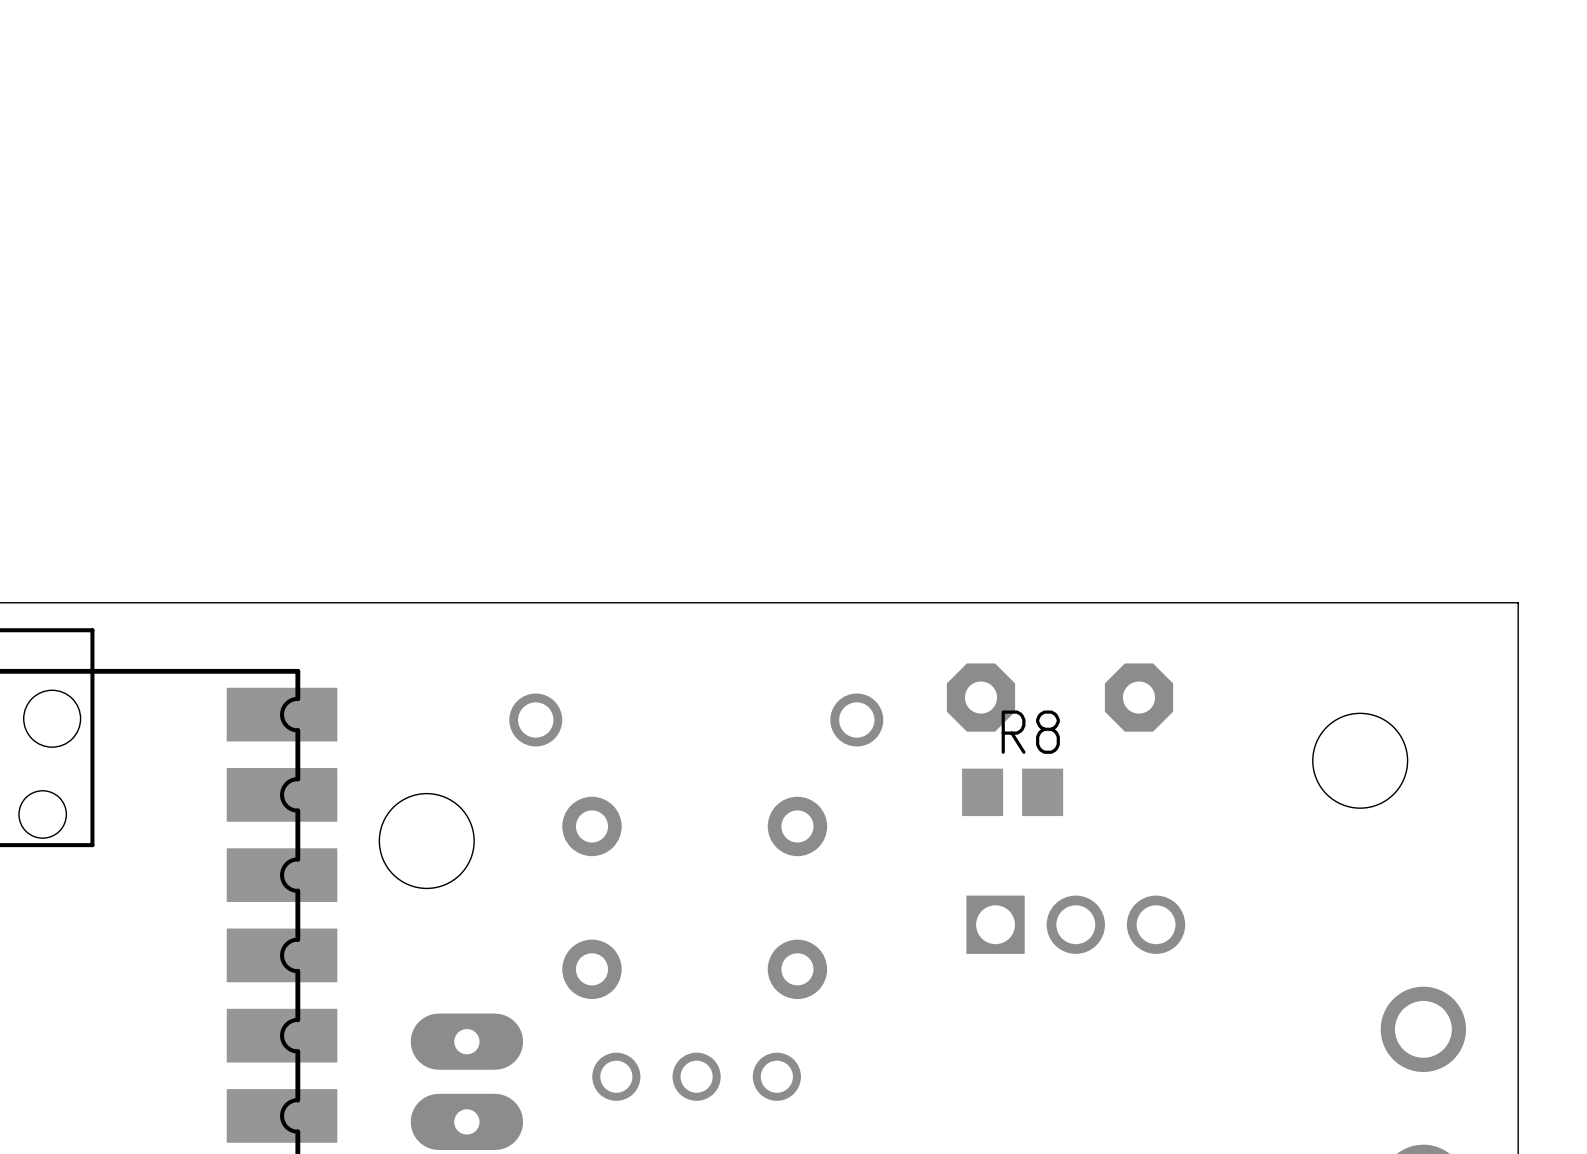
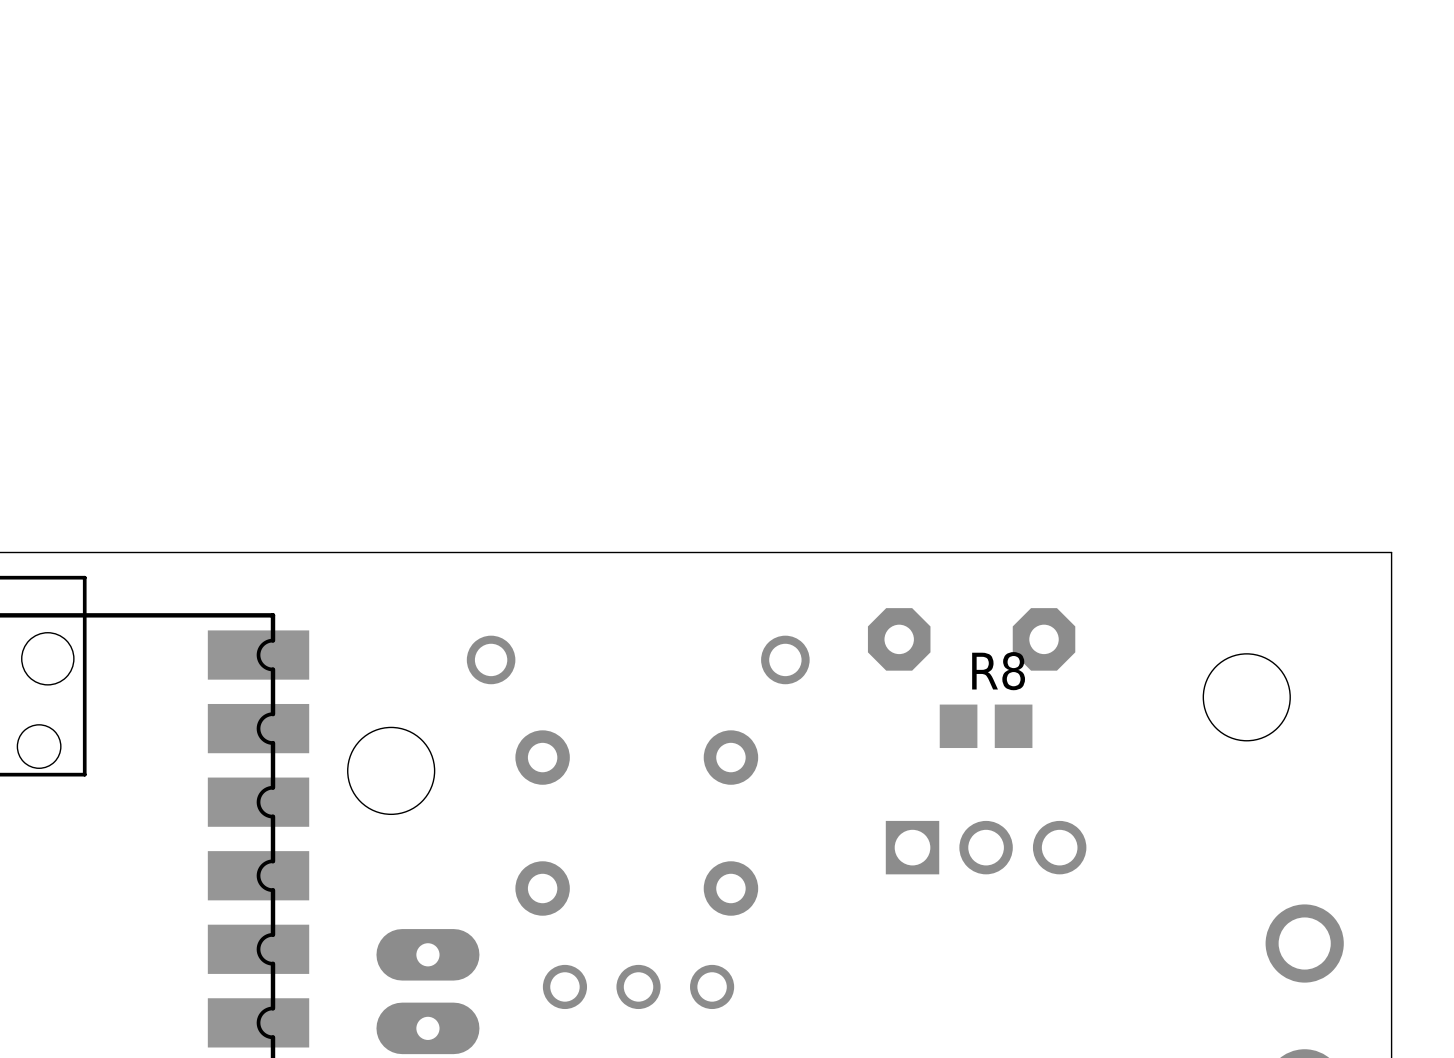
R8 position: (1012, 792) -> (986, 726)

